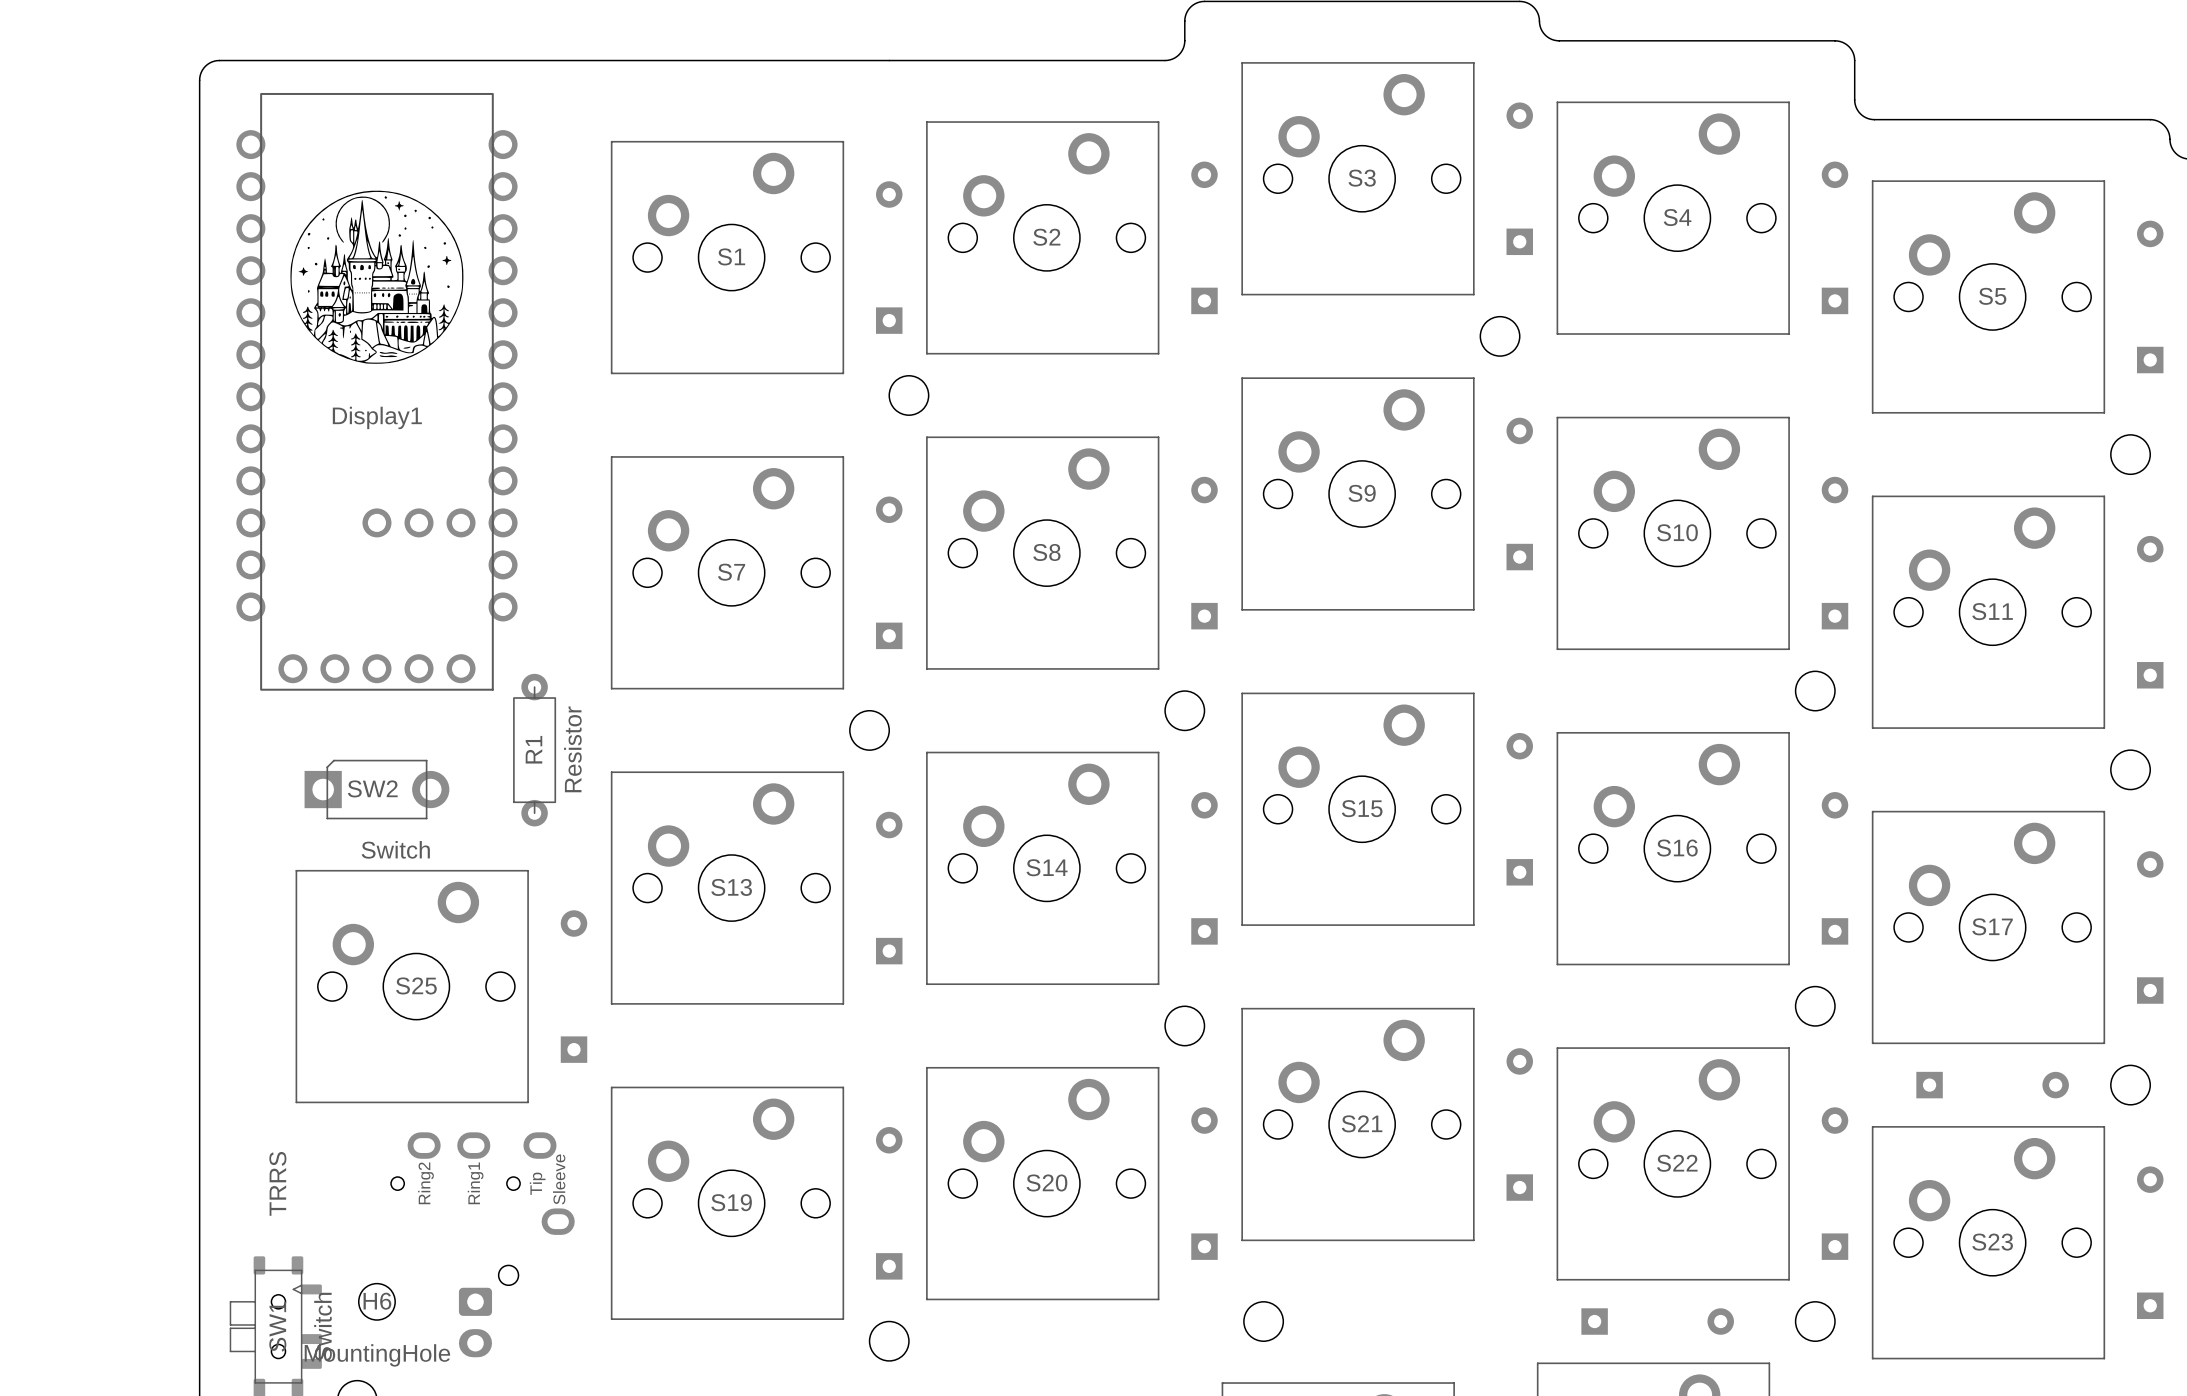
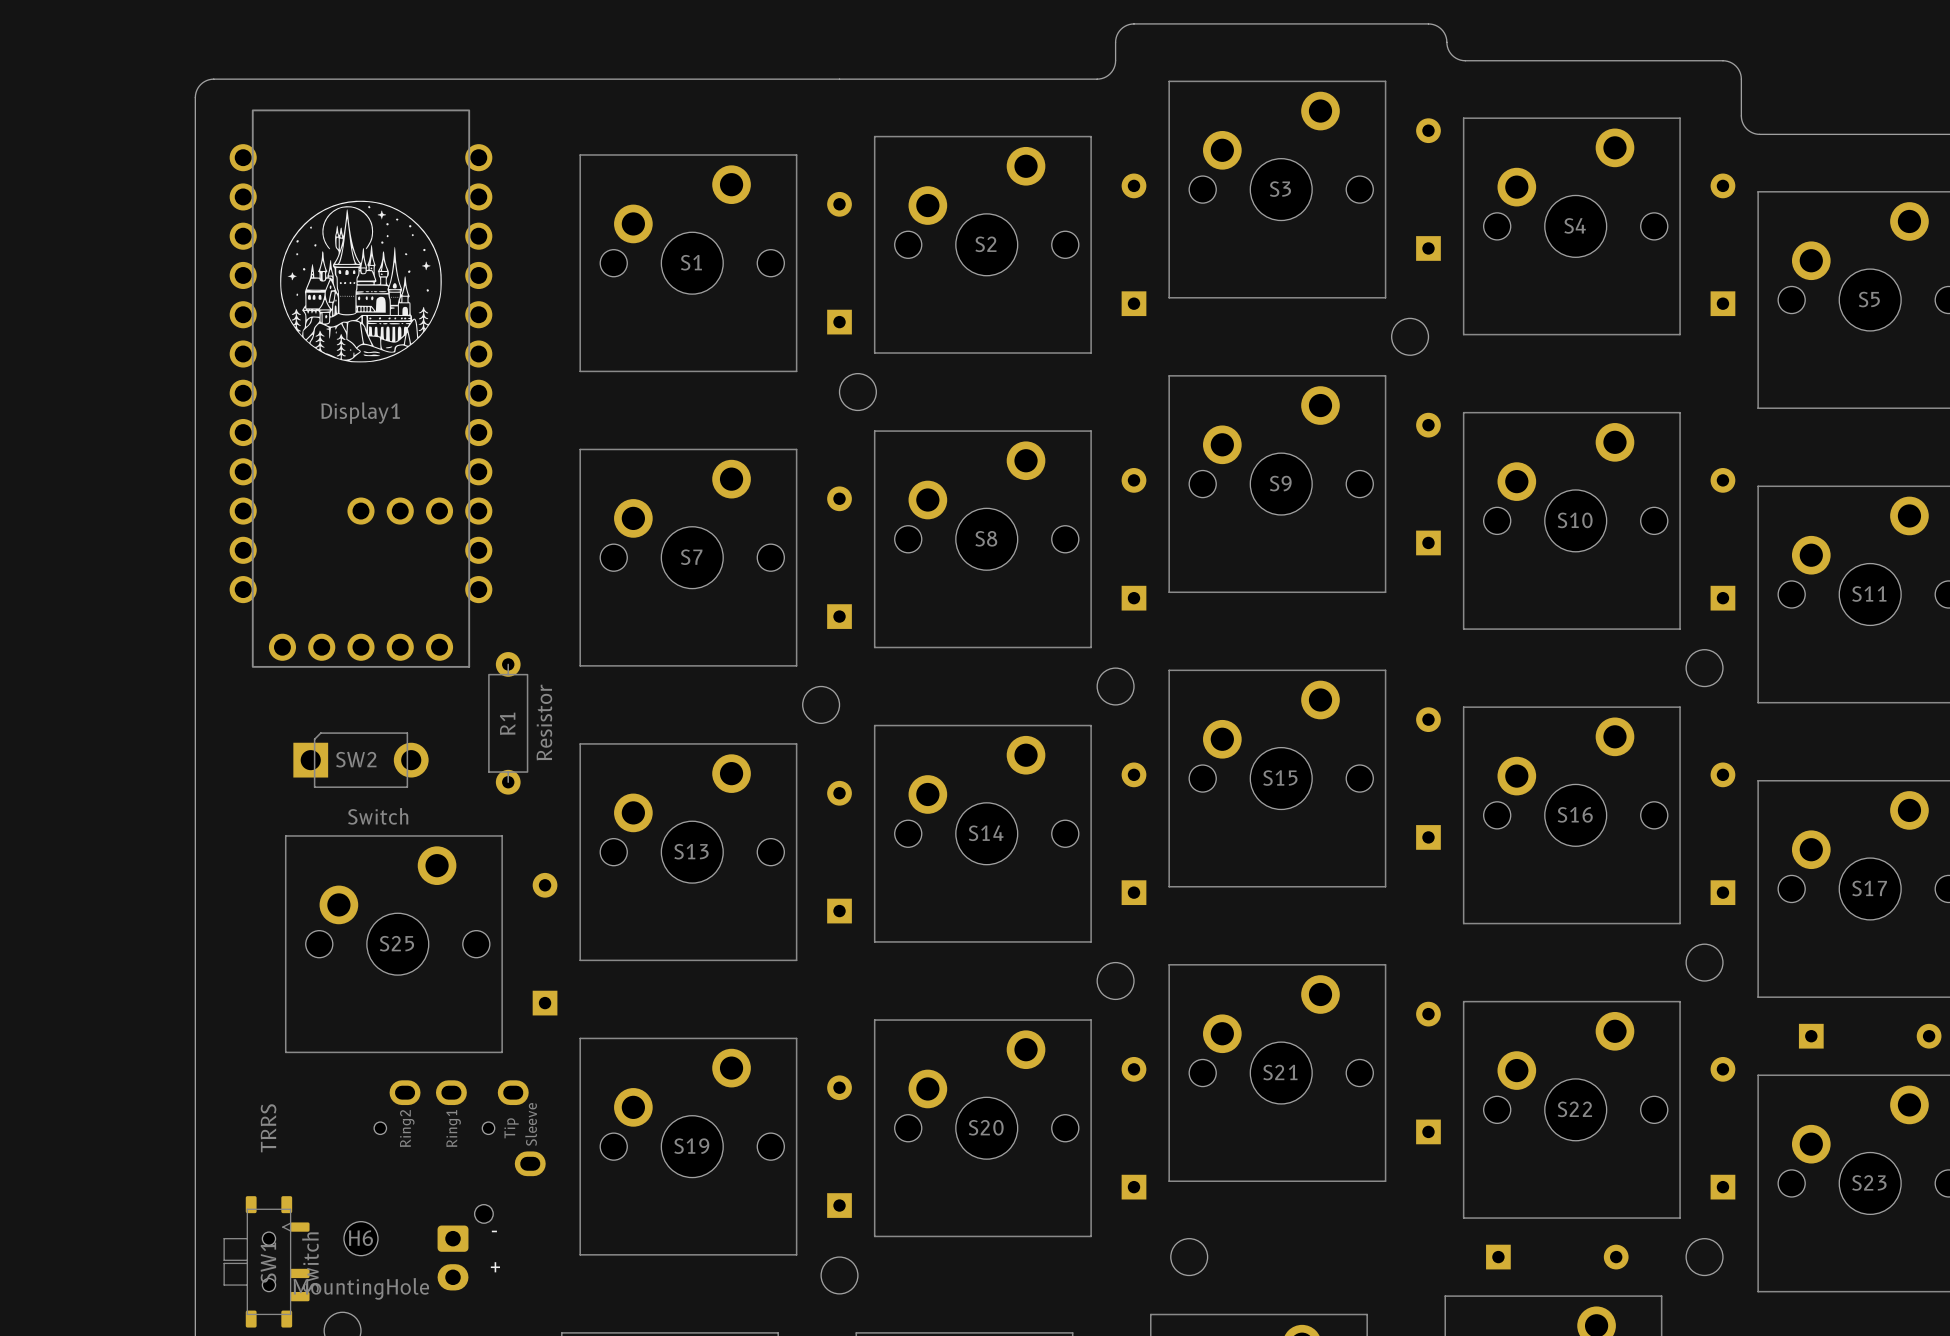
text: none -> - (494, 1231)
text: none -> + (495, 1267)

